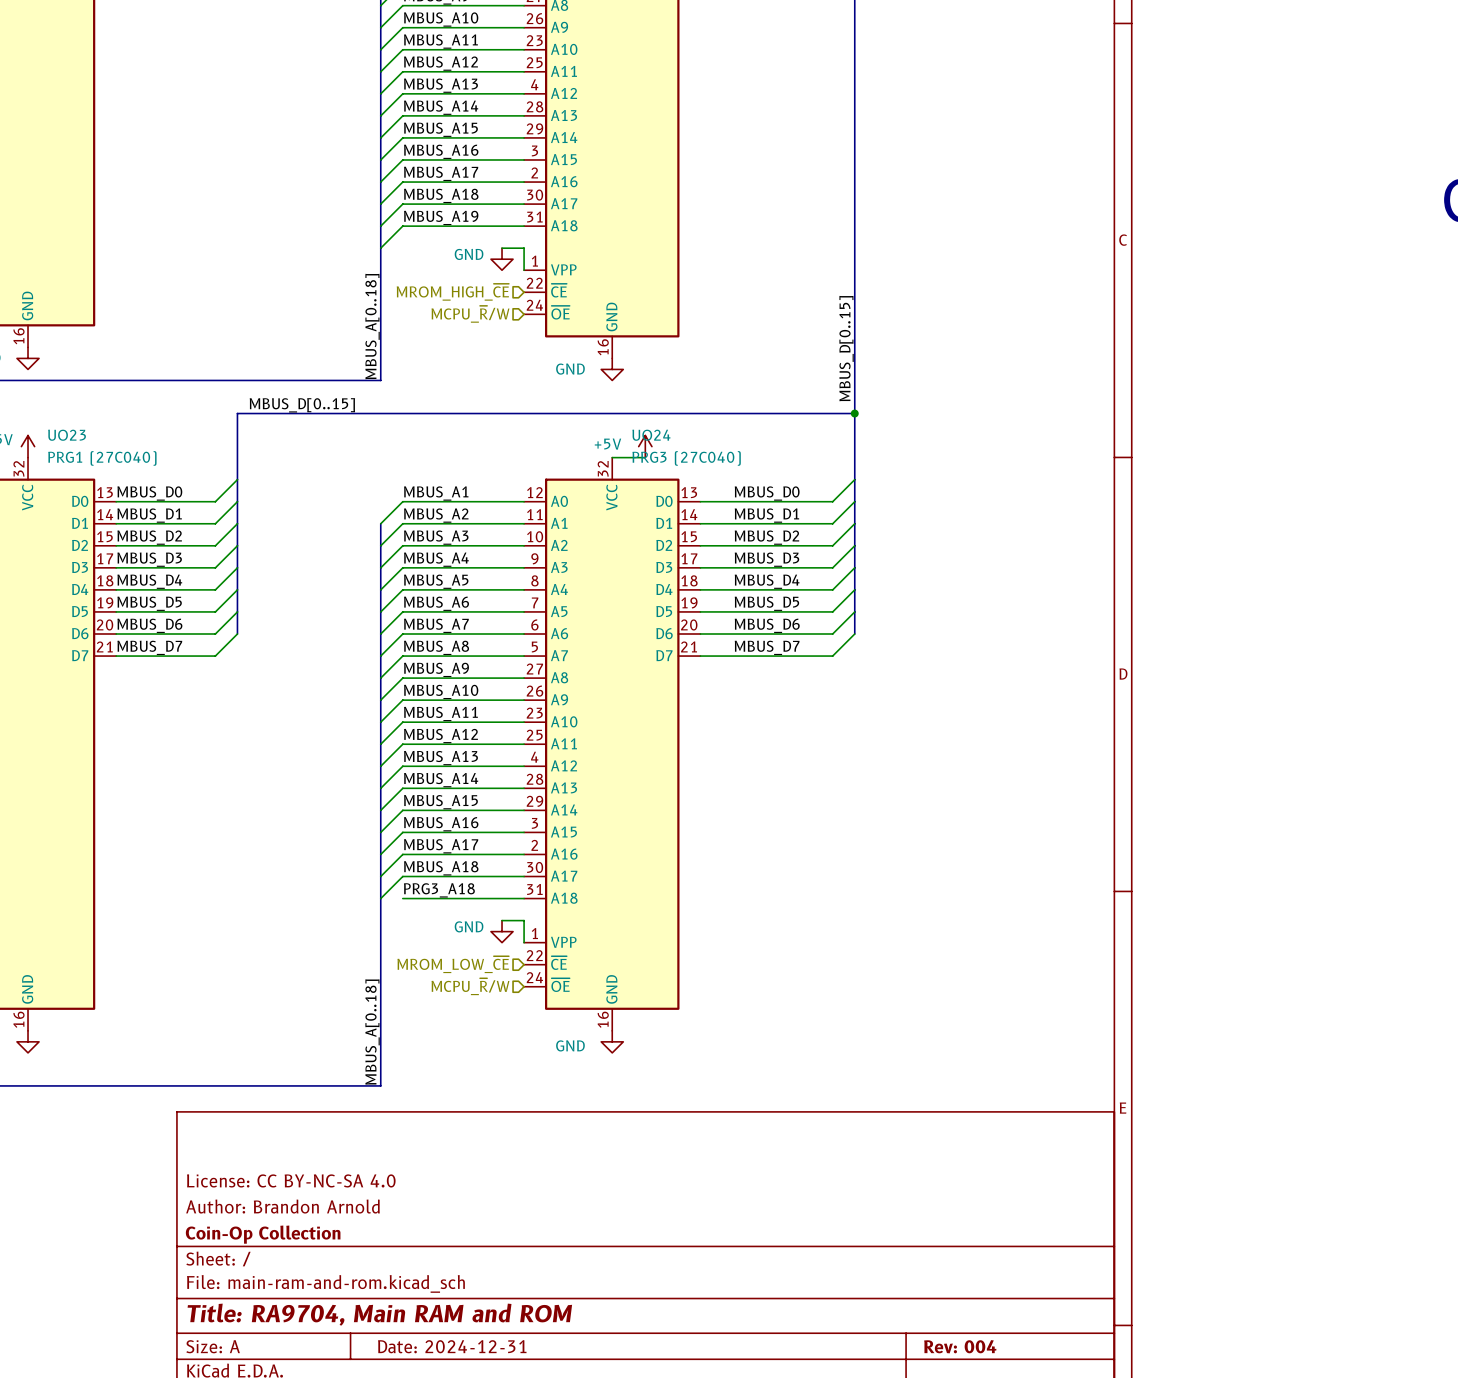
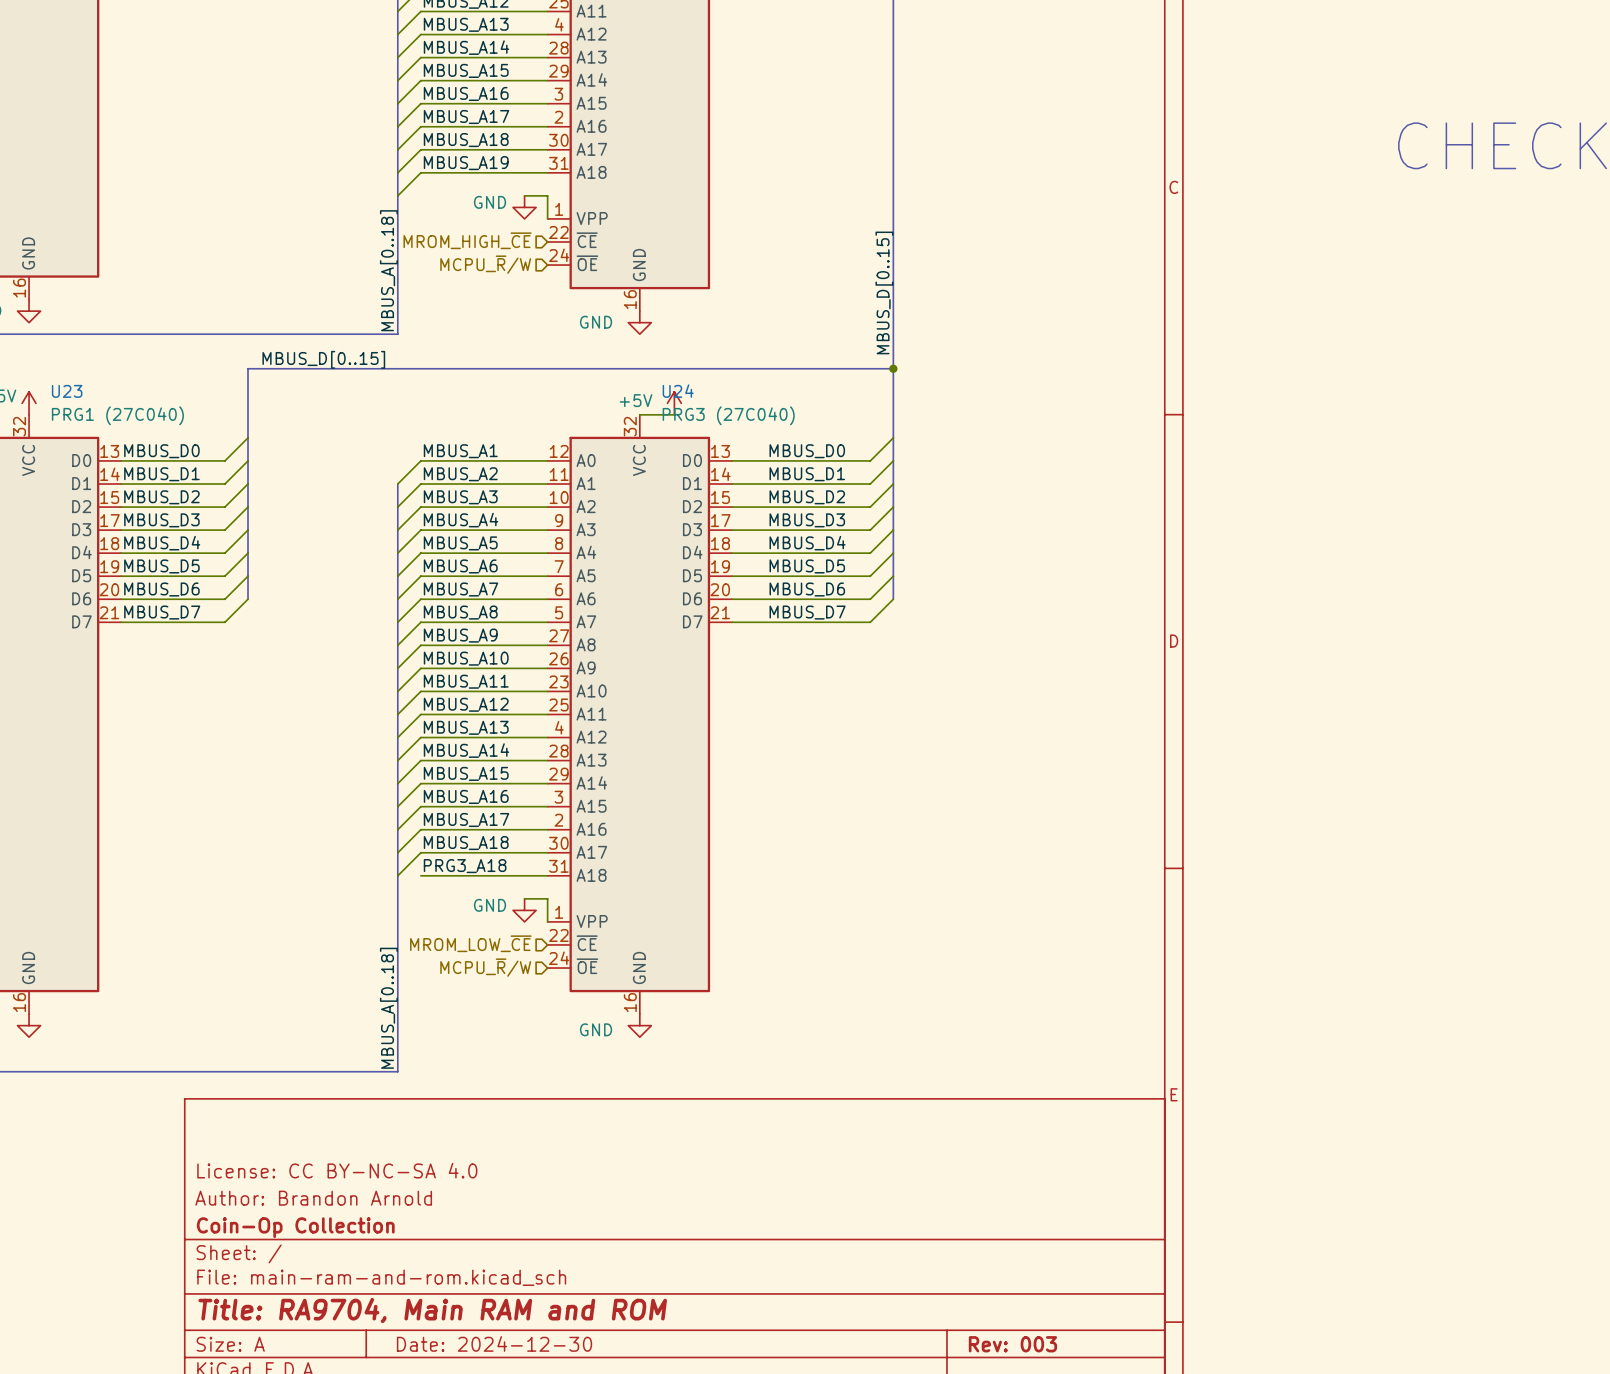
UO23 name: UO23 (67, 435) -> U23 (67, 391)
UO24 name: UO24 (651, 435) -> U24 (678, 391)
title block: Date: 2024-12-31 (452, 1346) -> Date: 2024-12-30 (494, 1343)
title block: Rev: 004 (960, 1346) -> Rev: 003 (1012, 1344)

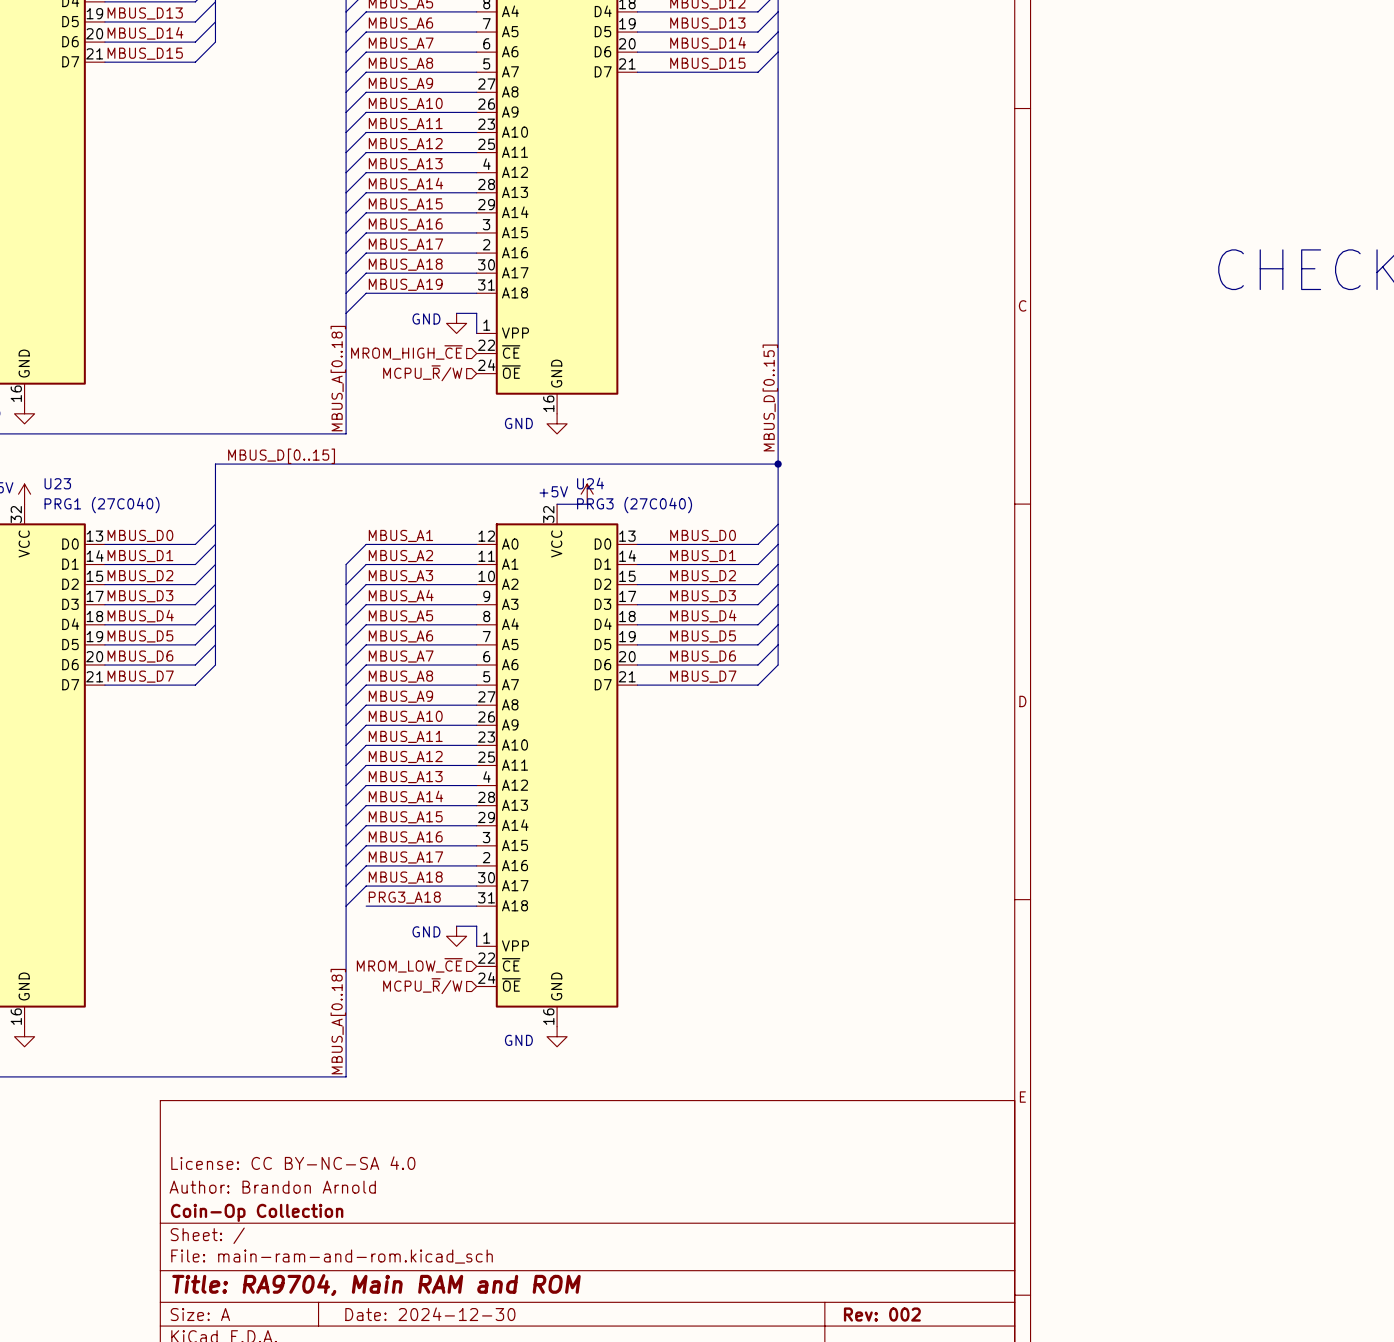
title block: Rev: 003 (1012, 1344) -> Rev: 002 (882, 1314)

